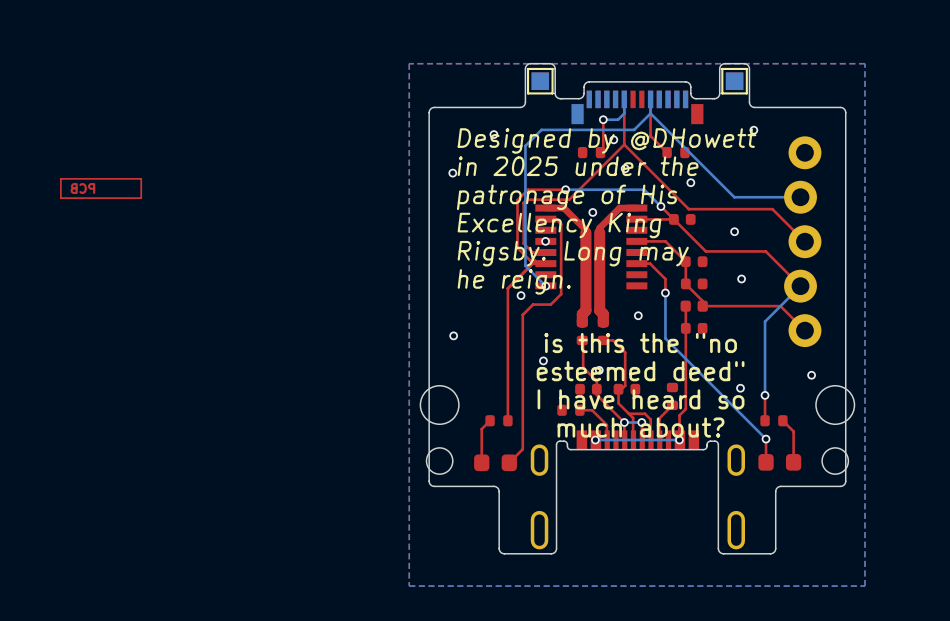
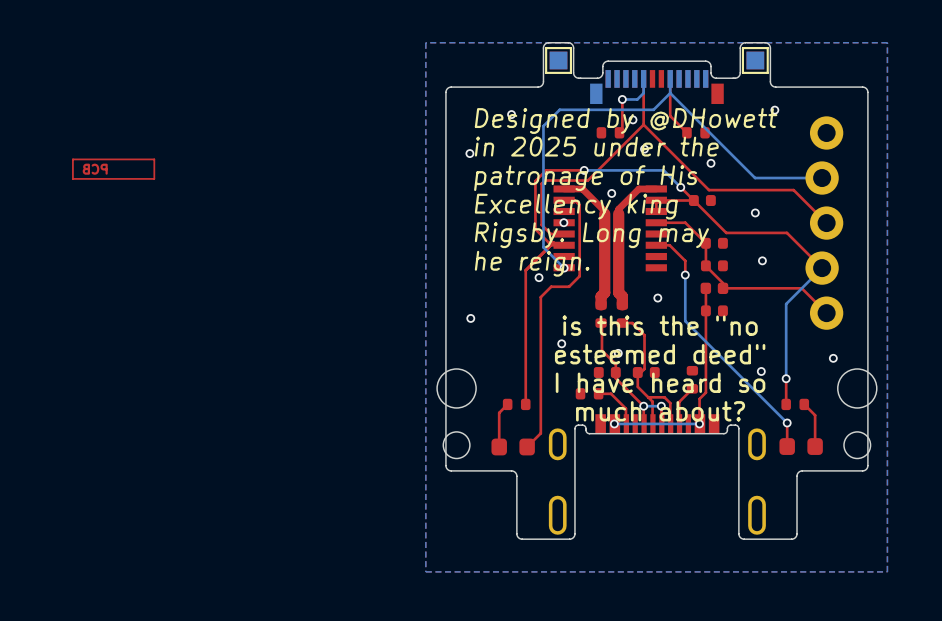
text: Excellency King (559, 225) -> Excellency king (576, 206)

